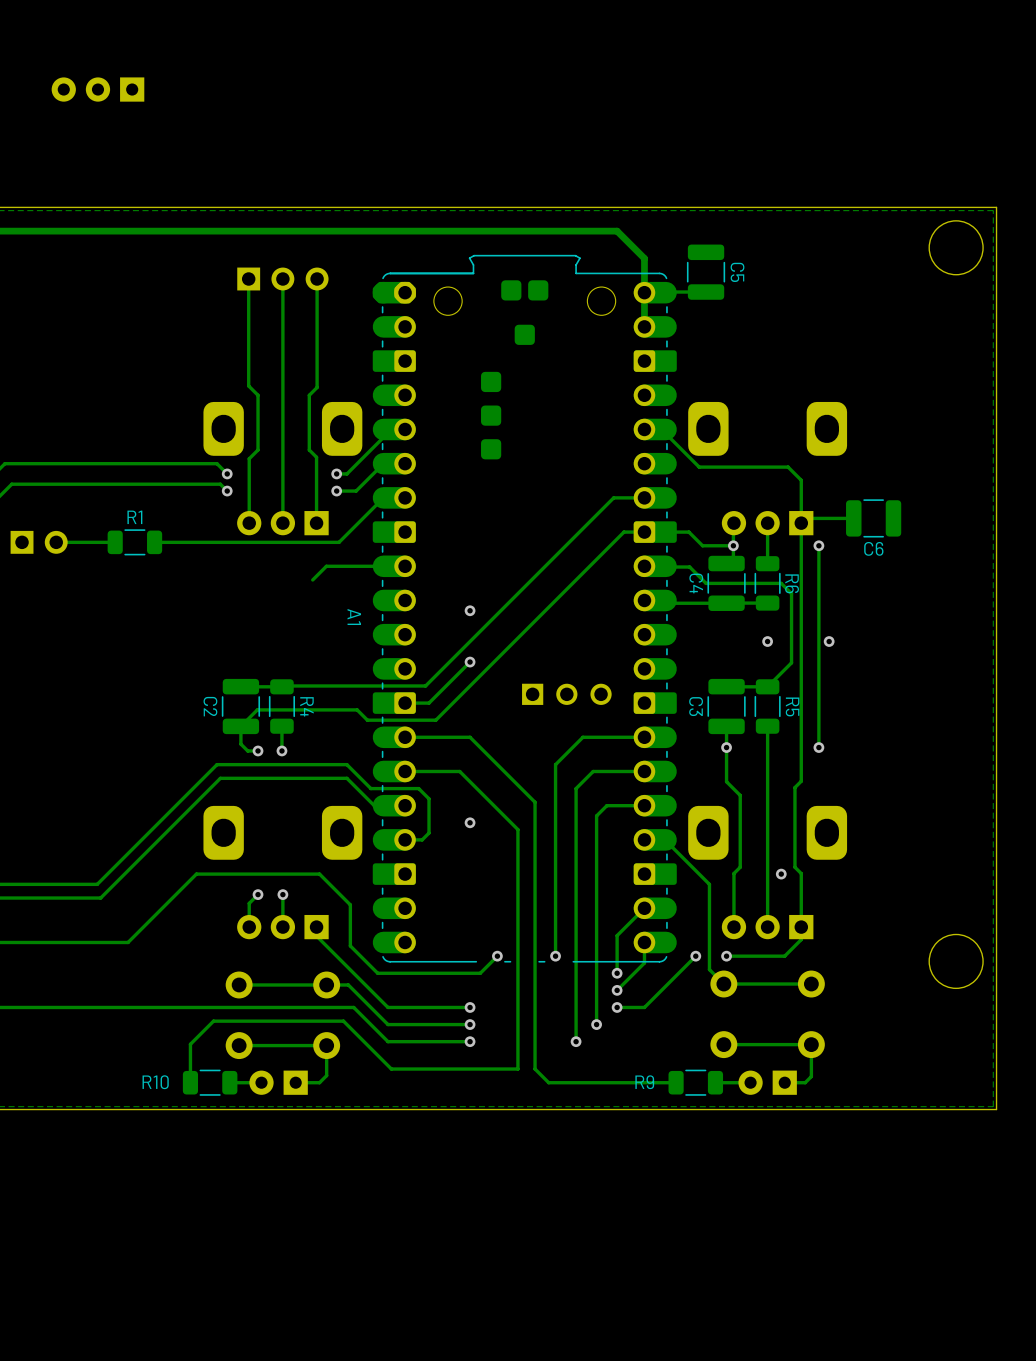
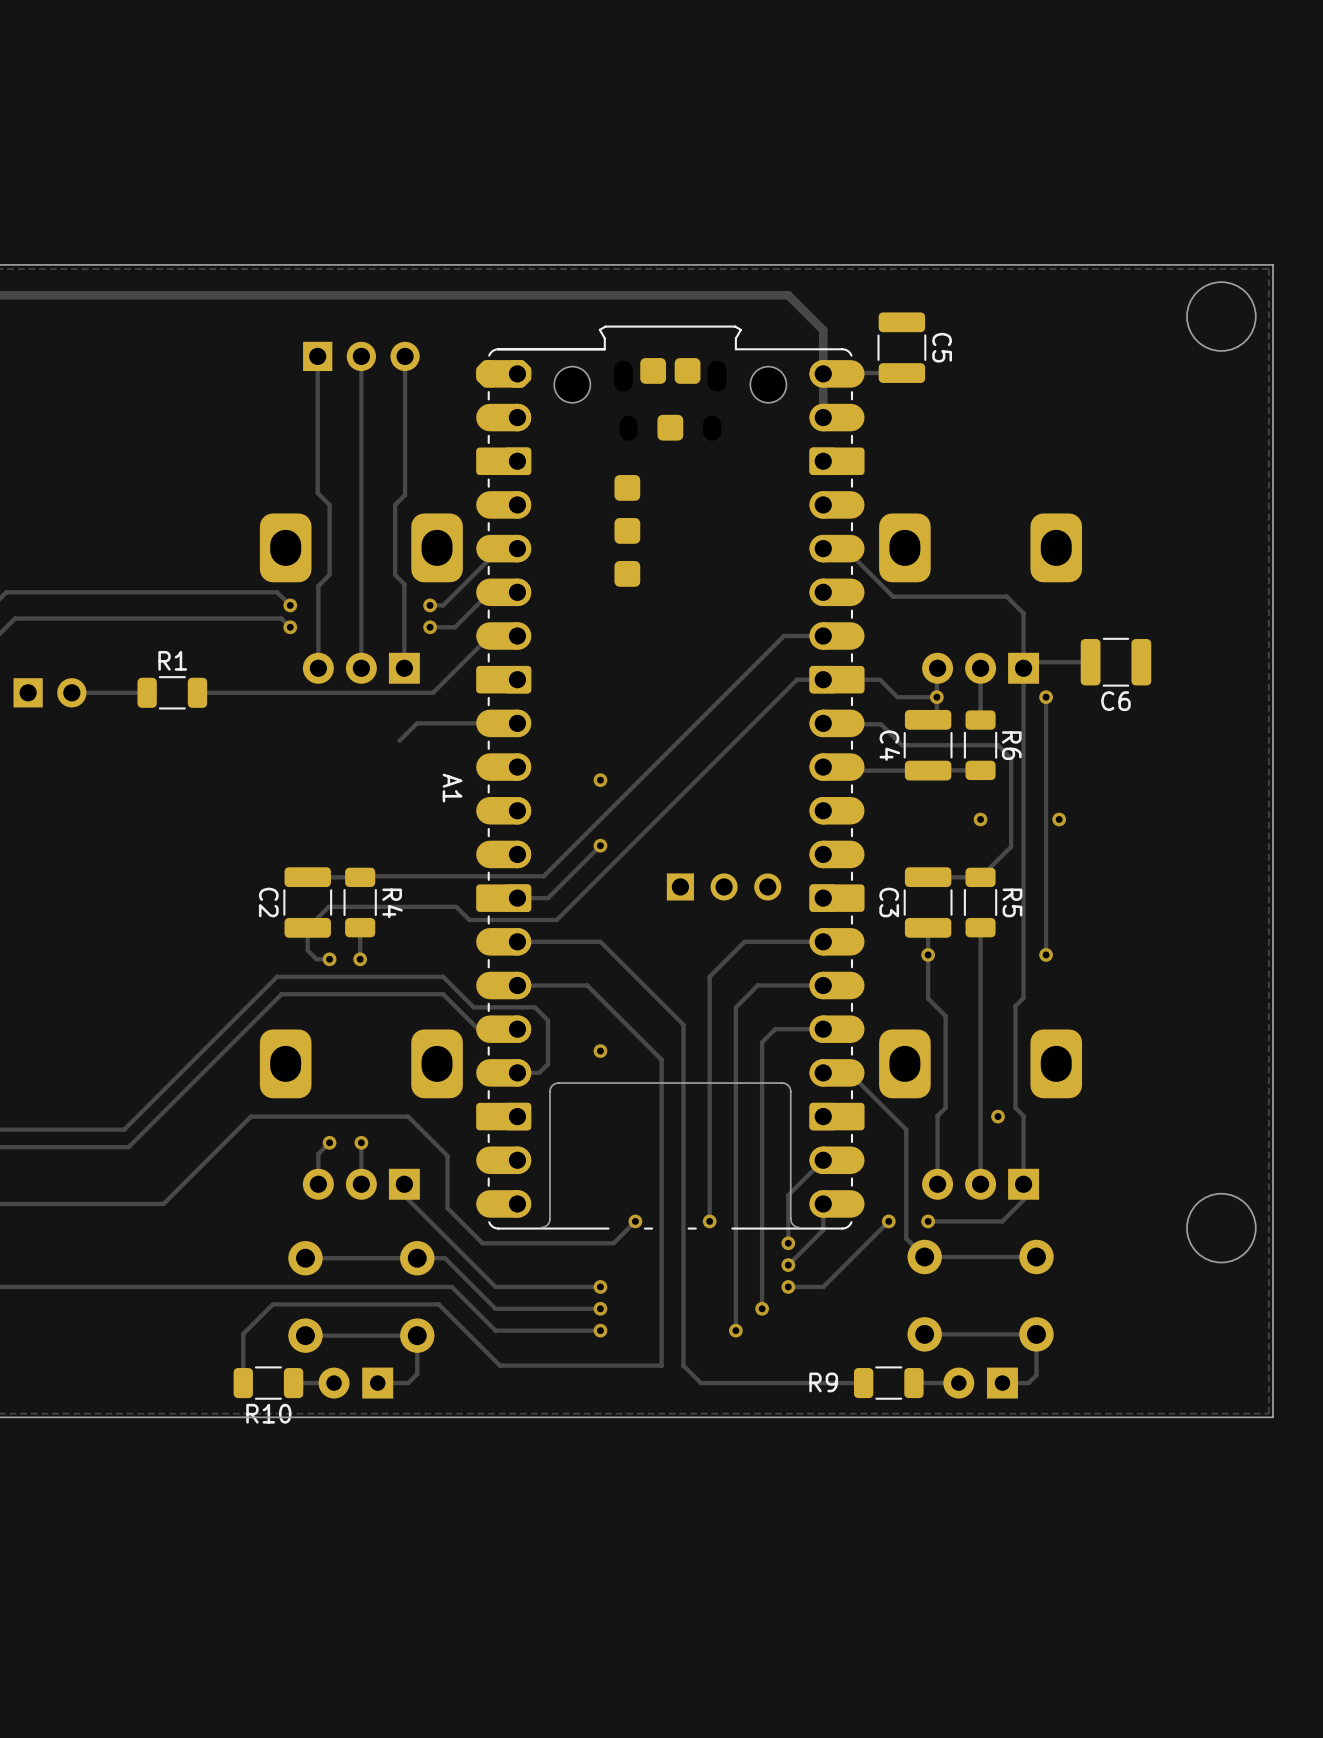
part: (97, 89) -> none
A1 footprint: [372, 254, 677, 963] -> [476, 325, 865, 1230]
R10 name position: R10 (155, 1082) -> R10 (268, 1413)

